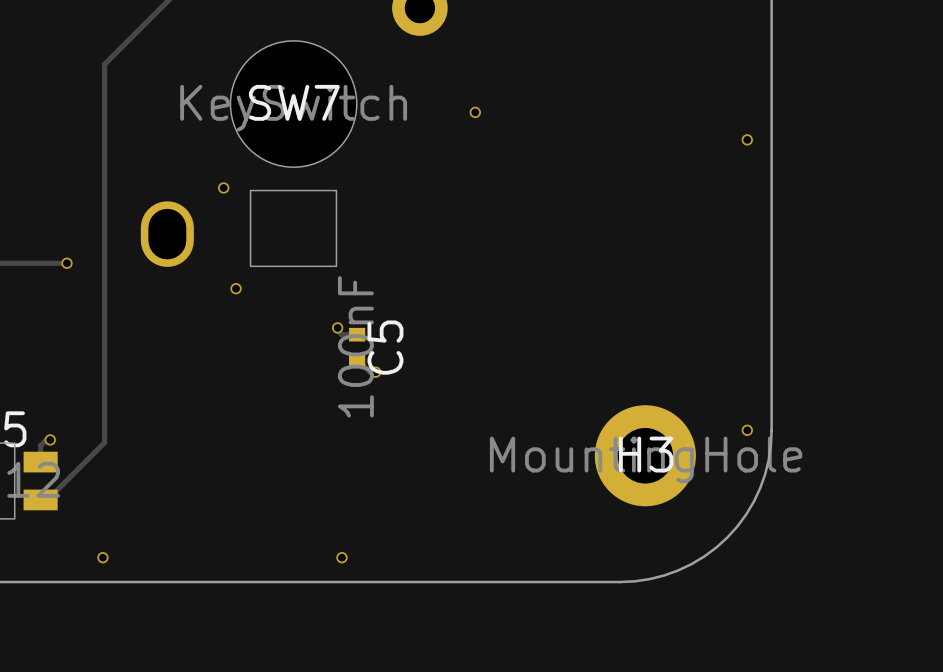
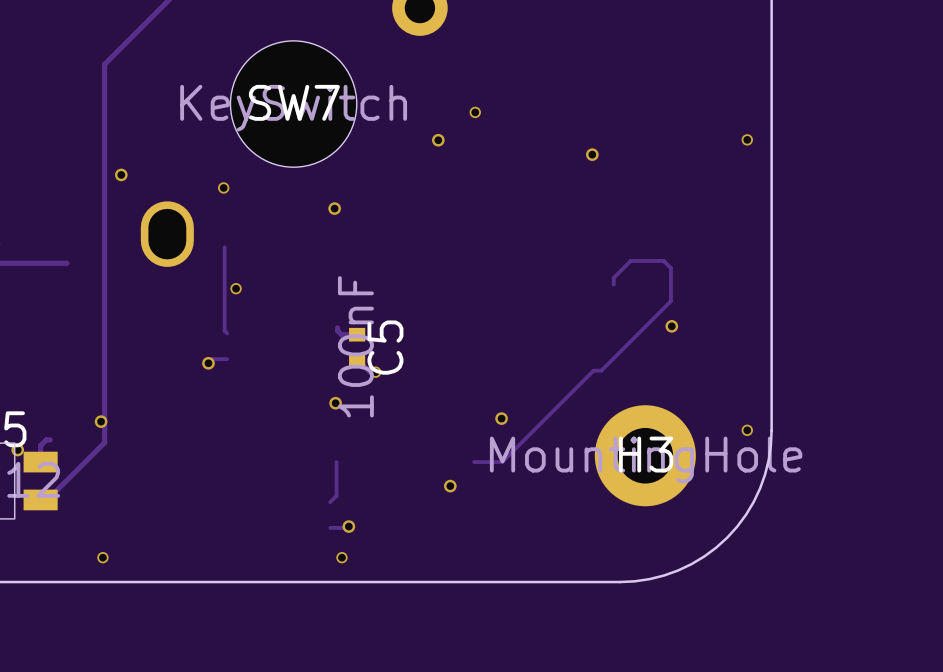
via: none -> (438, 140)
via: none -> (592, 154)
via: none -> (121, 174)
via: none -> (334, 208)
part: (293, 228) -> none
track: none -> (224, 247) (224, 330) (227, 333)
via: (66, 263) -> none
track: none -> (613, 284) (613, 277) (630, 260) (663, 260) (670, 268) (670, 301) (601, 370) (593, 370) (502, 462) (474, 462)
via: none -> (671, 326)
via: (337, 327) -> none
track: none -> (227, 359) (212, 359) (208, 363)
via: none -> (208, 363)
via: none -> (335, 403)
via: none -> (501, 418)
via: none -> (101, 421)
via: (50, 439) -> none
via: none -> (17, 449)
track: none -> (336, 462) (336, 495) (330, 502)
via: none -> (450, 486)
track: none -> (348, 526) (330, 527)
via: none -> (348, 526)

